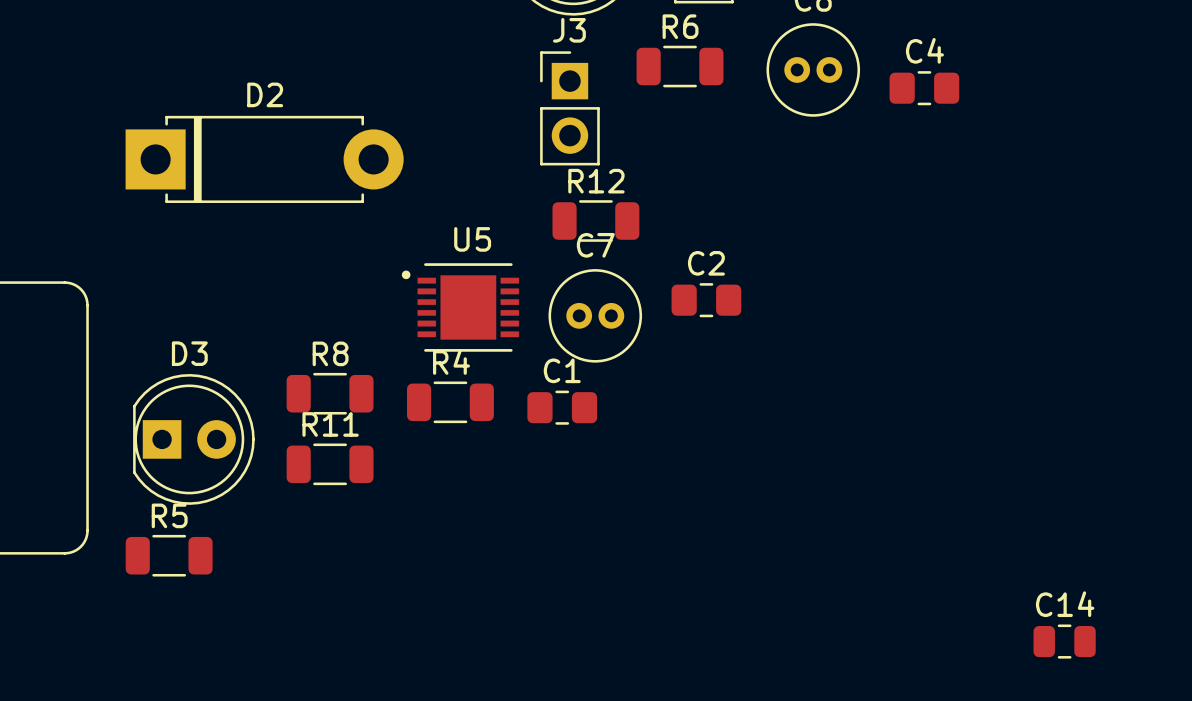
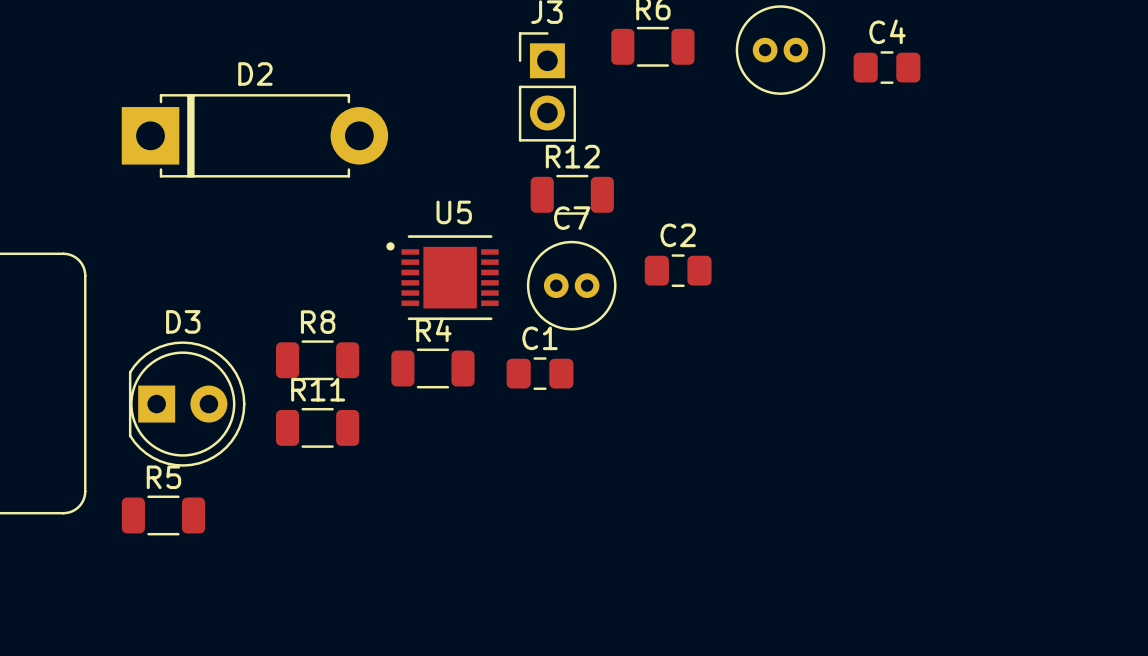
C14: (1064, 641) -> none

